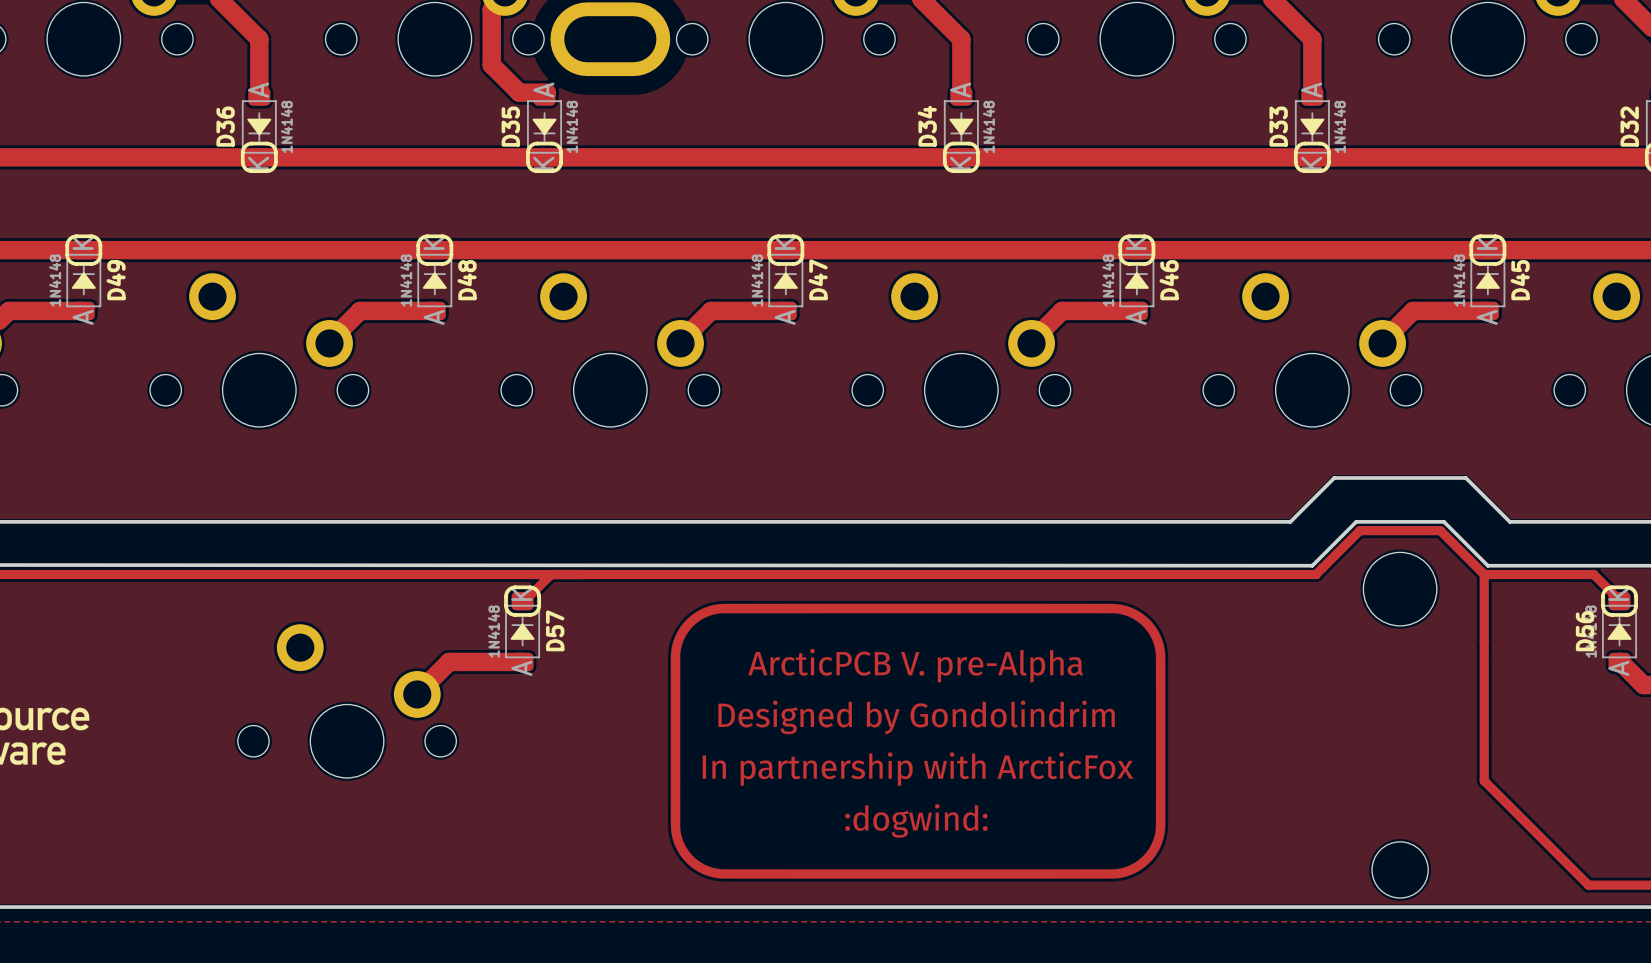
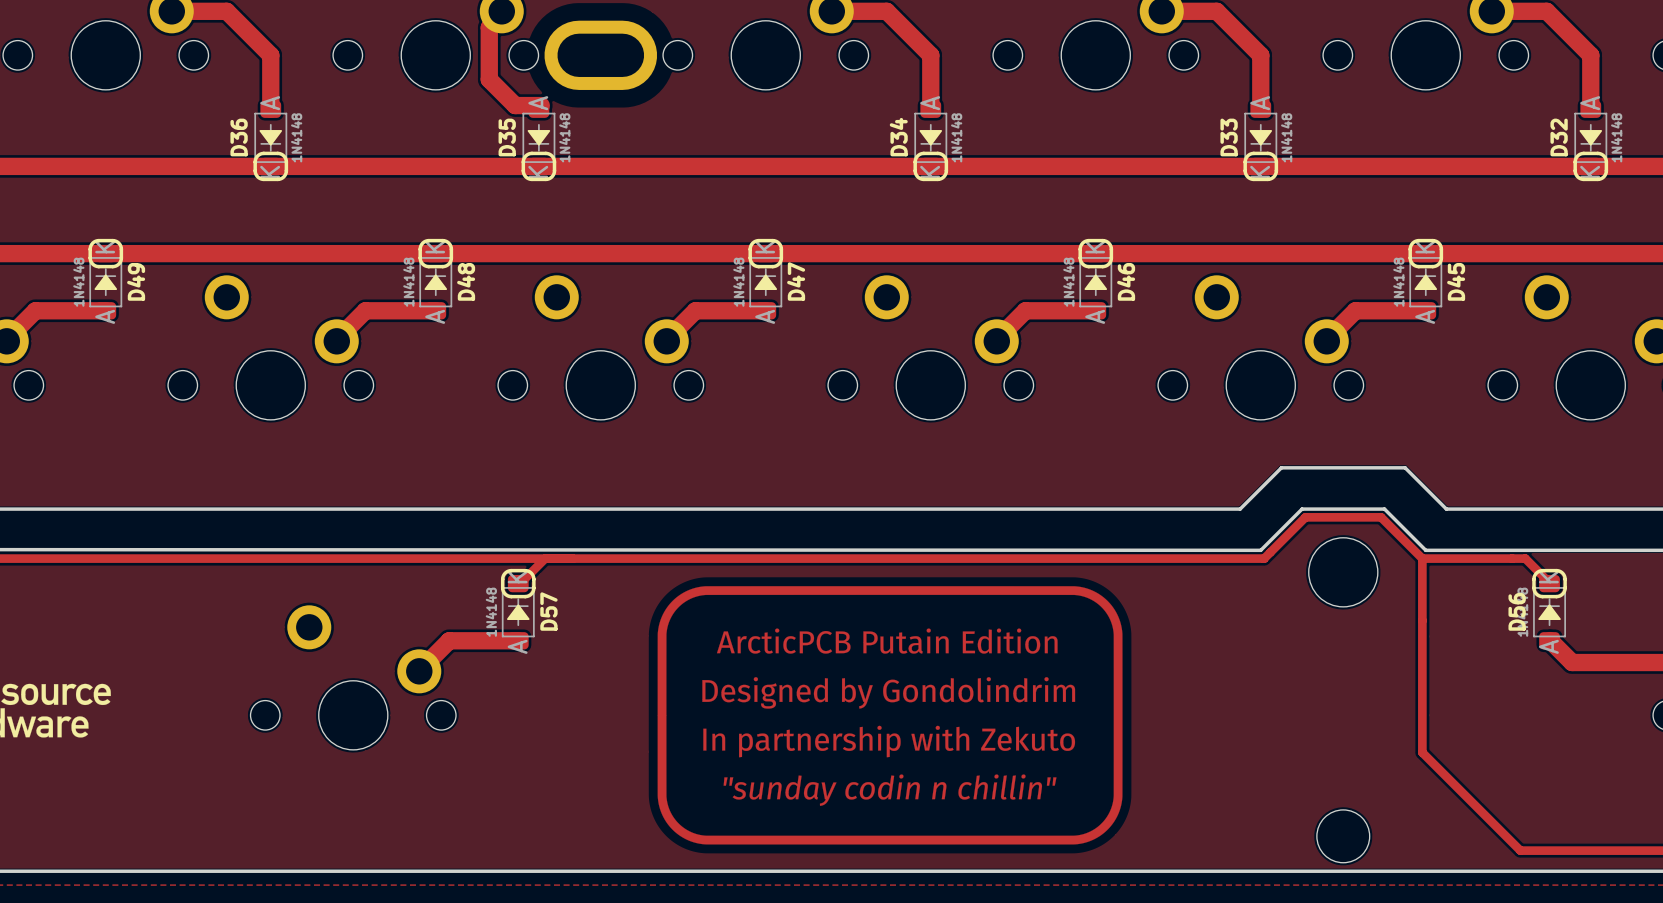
drawing: [670, 603, 1166, 879] -> none
part: none -> (890, 715)

